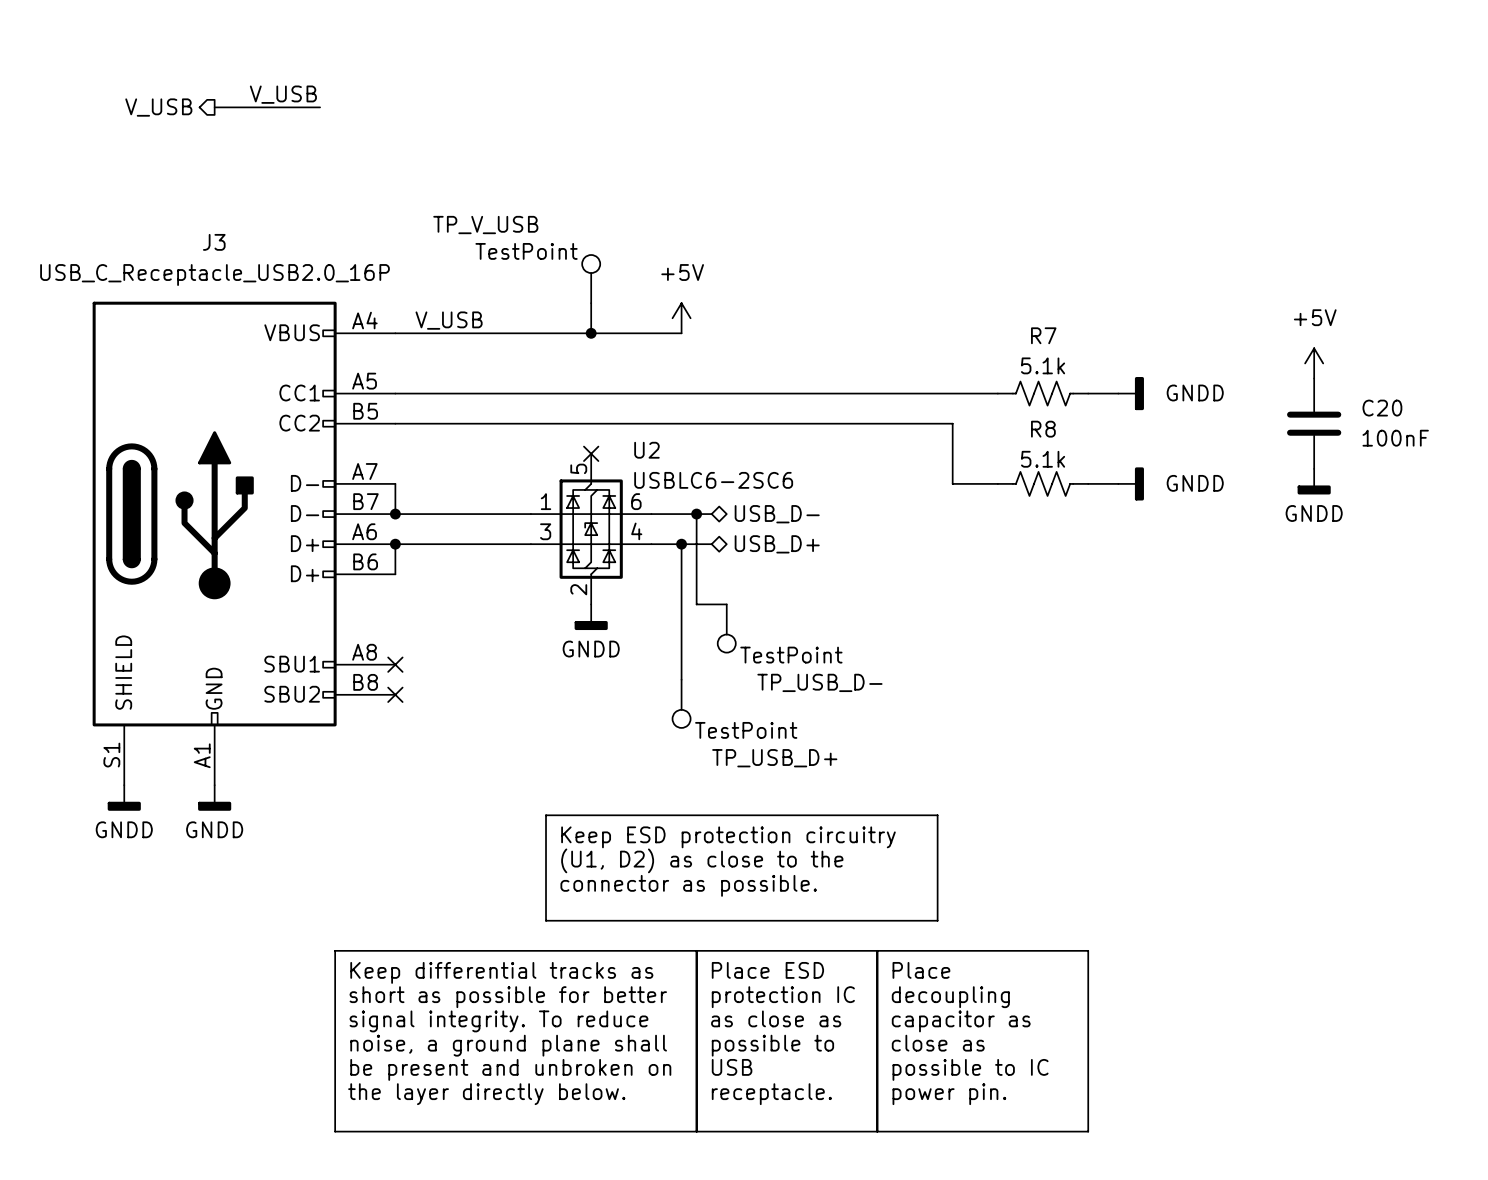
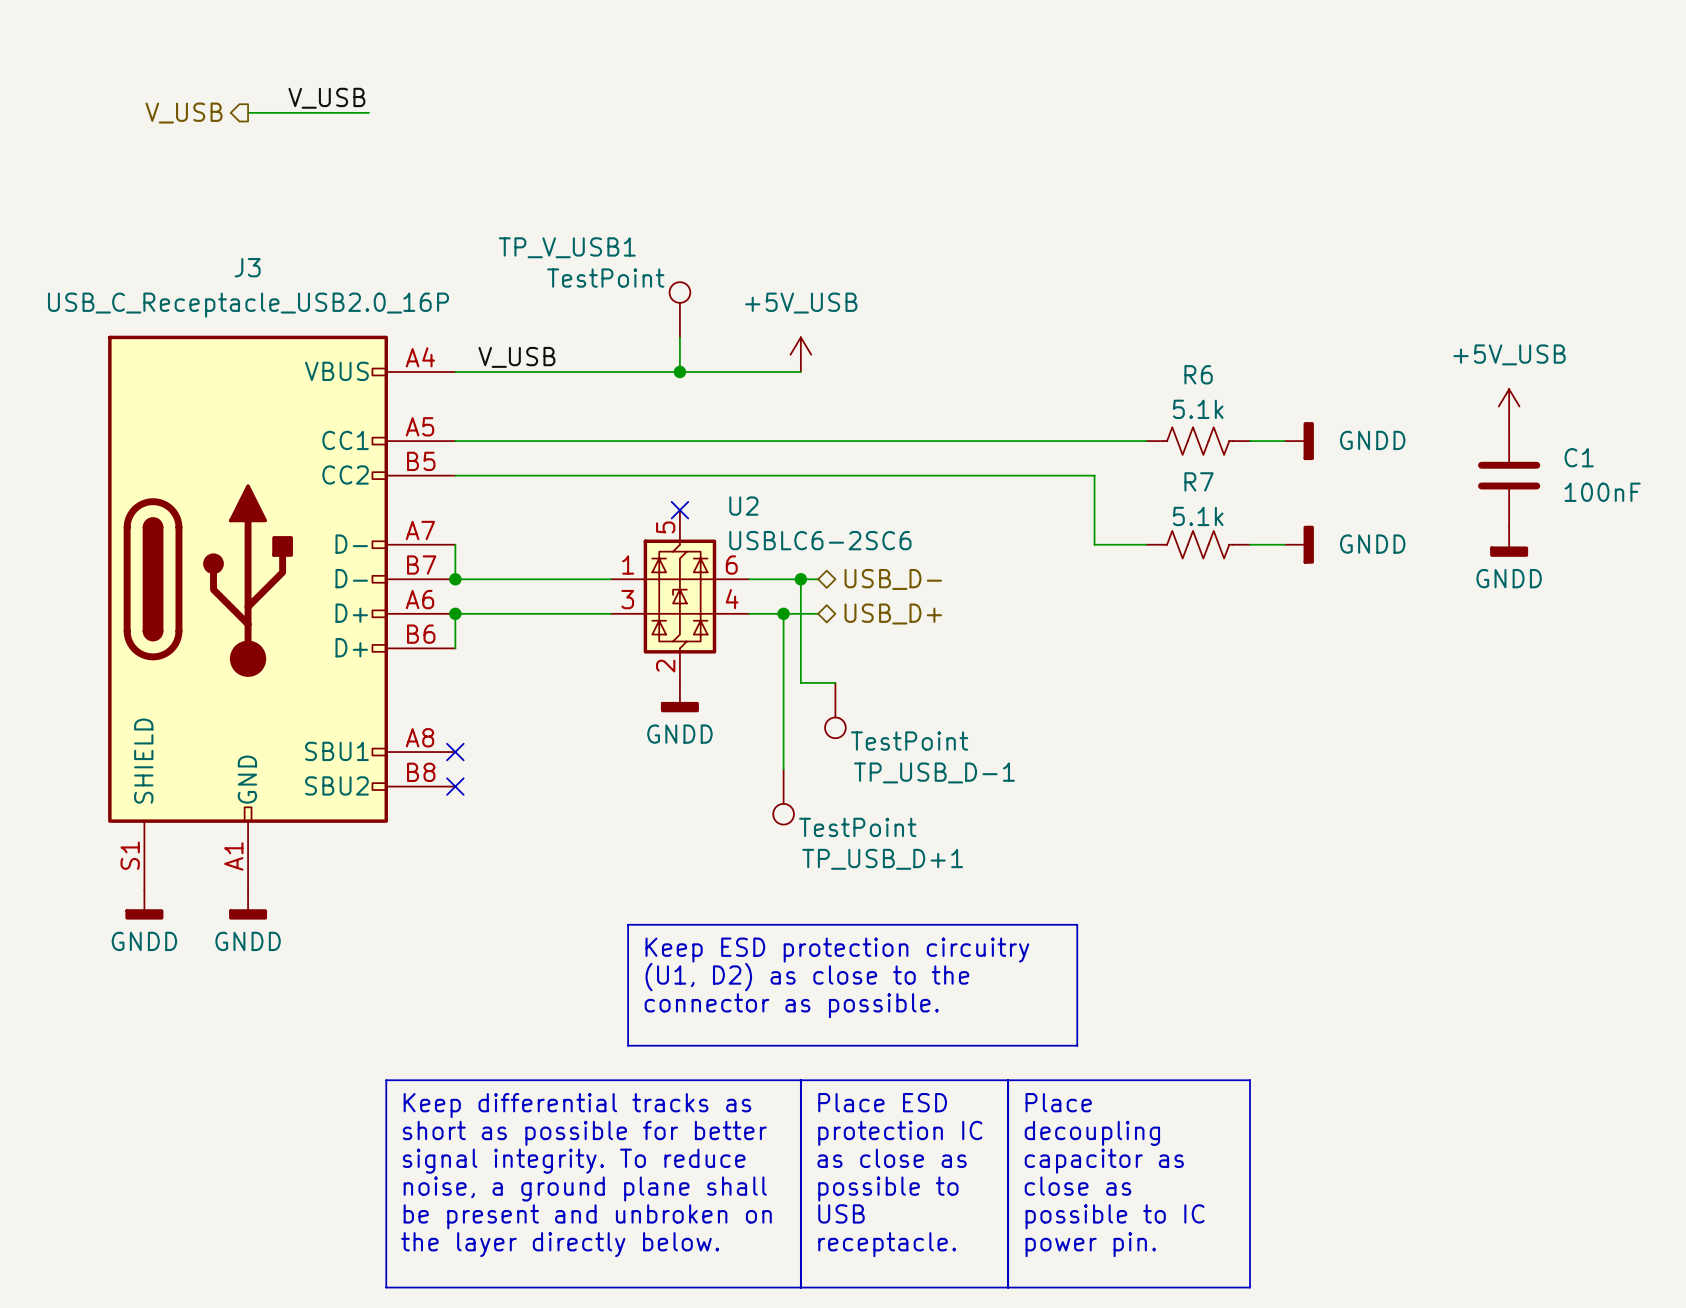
TP_V_USB name: TP_V_USB (485, 225) -> TP_V_USB1 (567, 247)
power symbol: +5V (681, 318) -> none
power symbol: none -> +5V_USB (800, 354)
wire: none -> (783, 371) (800, 371)
R7 name: R7 (1043, 335) -> R6 (1198, 374)
power symbol: +5V (1314, 363) -> +5V_USB (1509, 406)
C20 name: C20 (1382, 408) -> C1 (1579, 457)
R8 name: R8 (1043, 429) -> R7 (1199, 481)
TP_USB_D- name: TP_USB_D- (819, 682) -> TP_USB_D-1 (934, 772)
TP_USB_D+ name: TP_USB_D+ (774, 758) -> TP_USB_D+1 (882, 859)

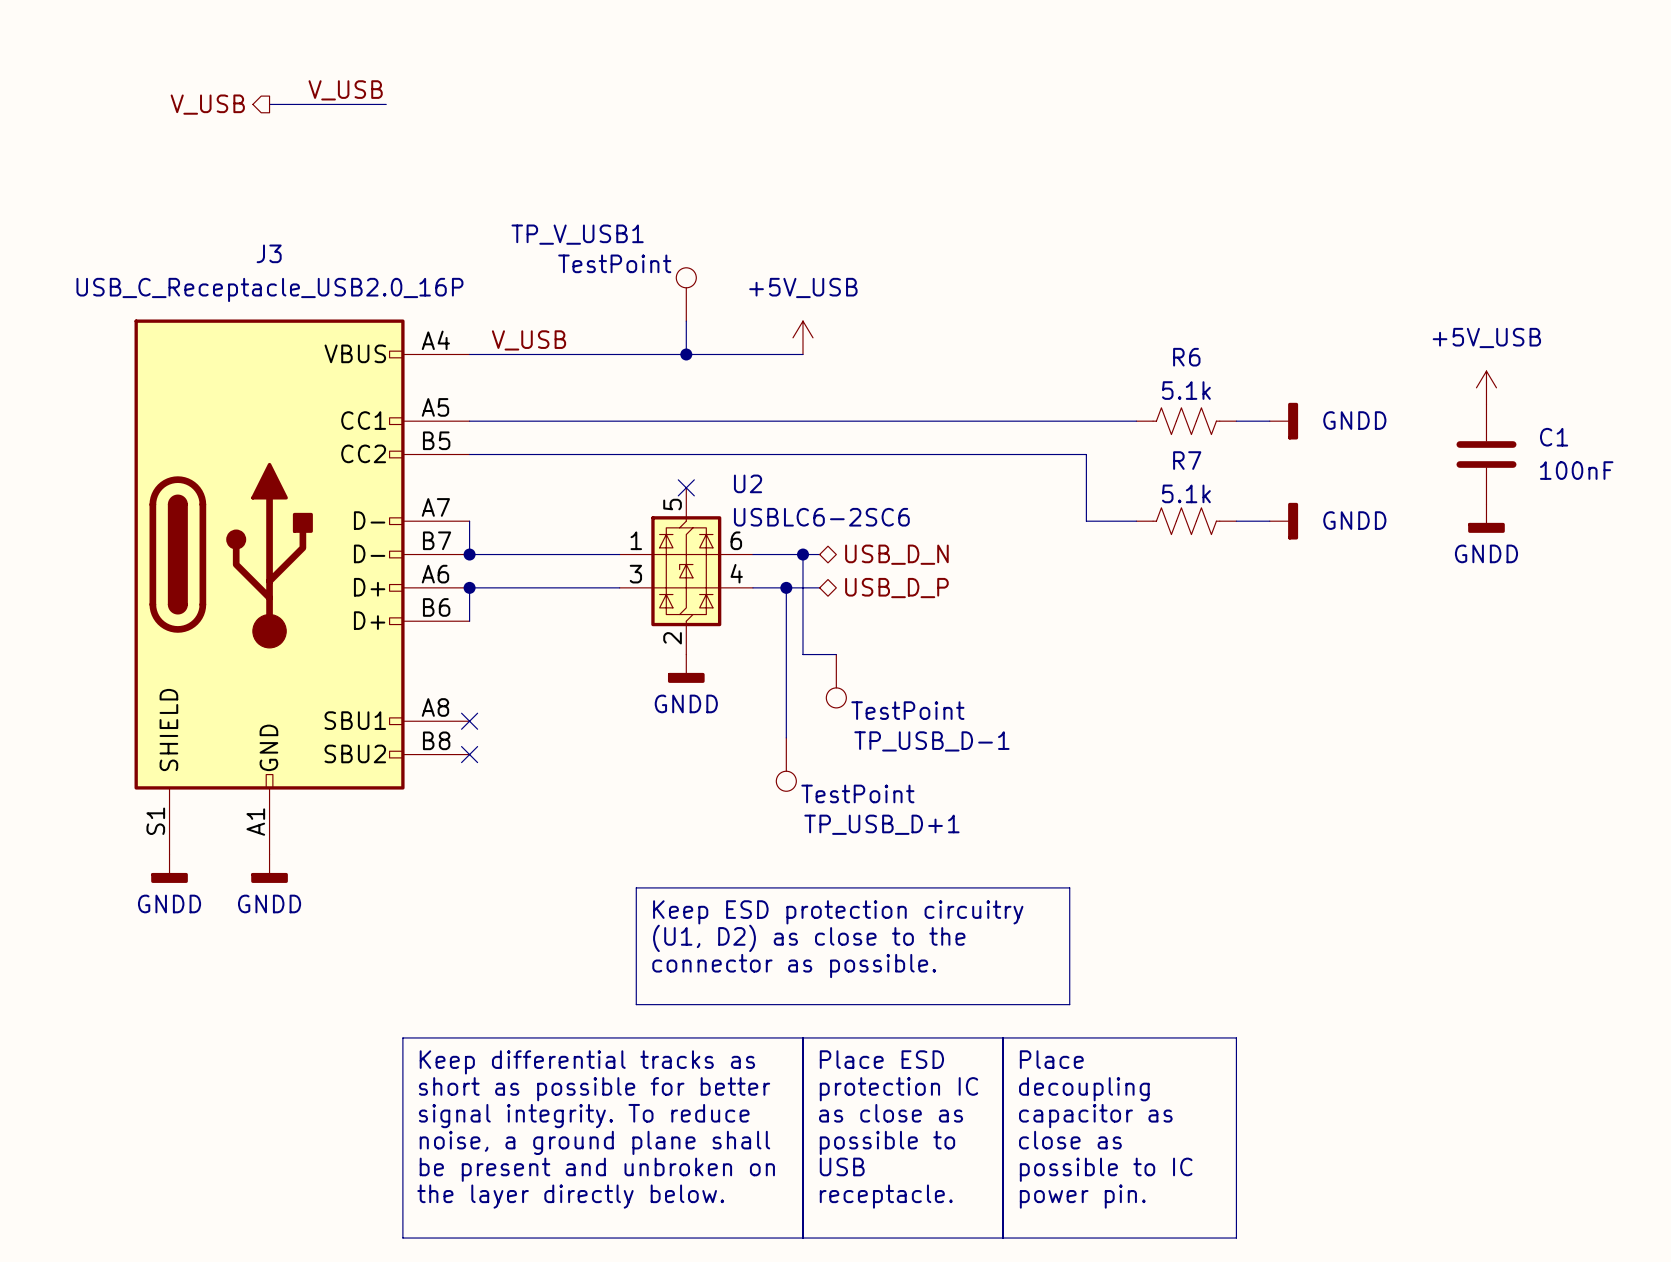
hierarchical label: USB_D- (893, 579) -> USB_D_N (896, 554)
hierarchical label: USB_D+ (893, 614) -> USB_D_P (896, 588)

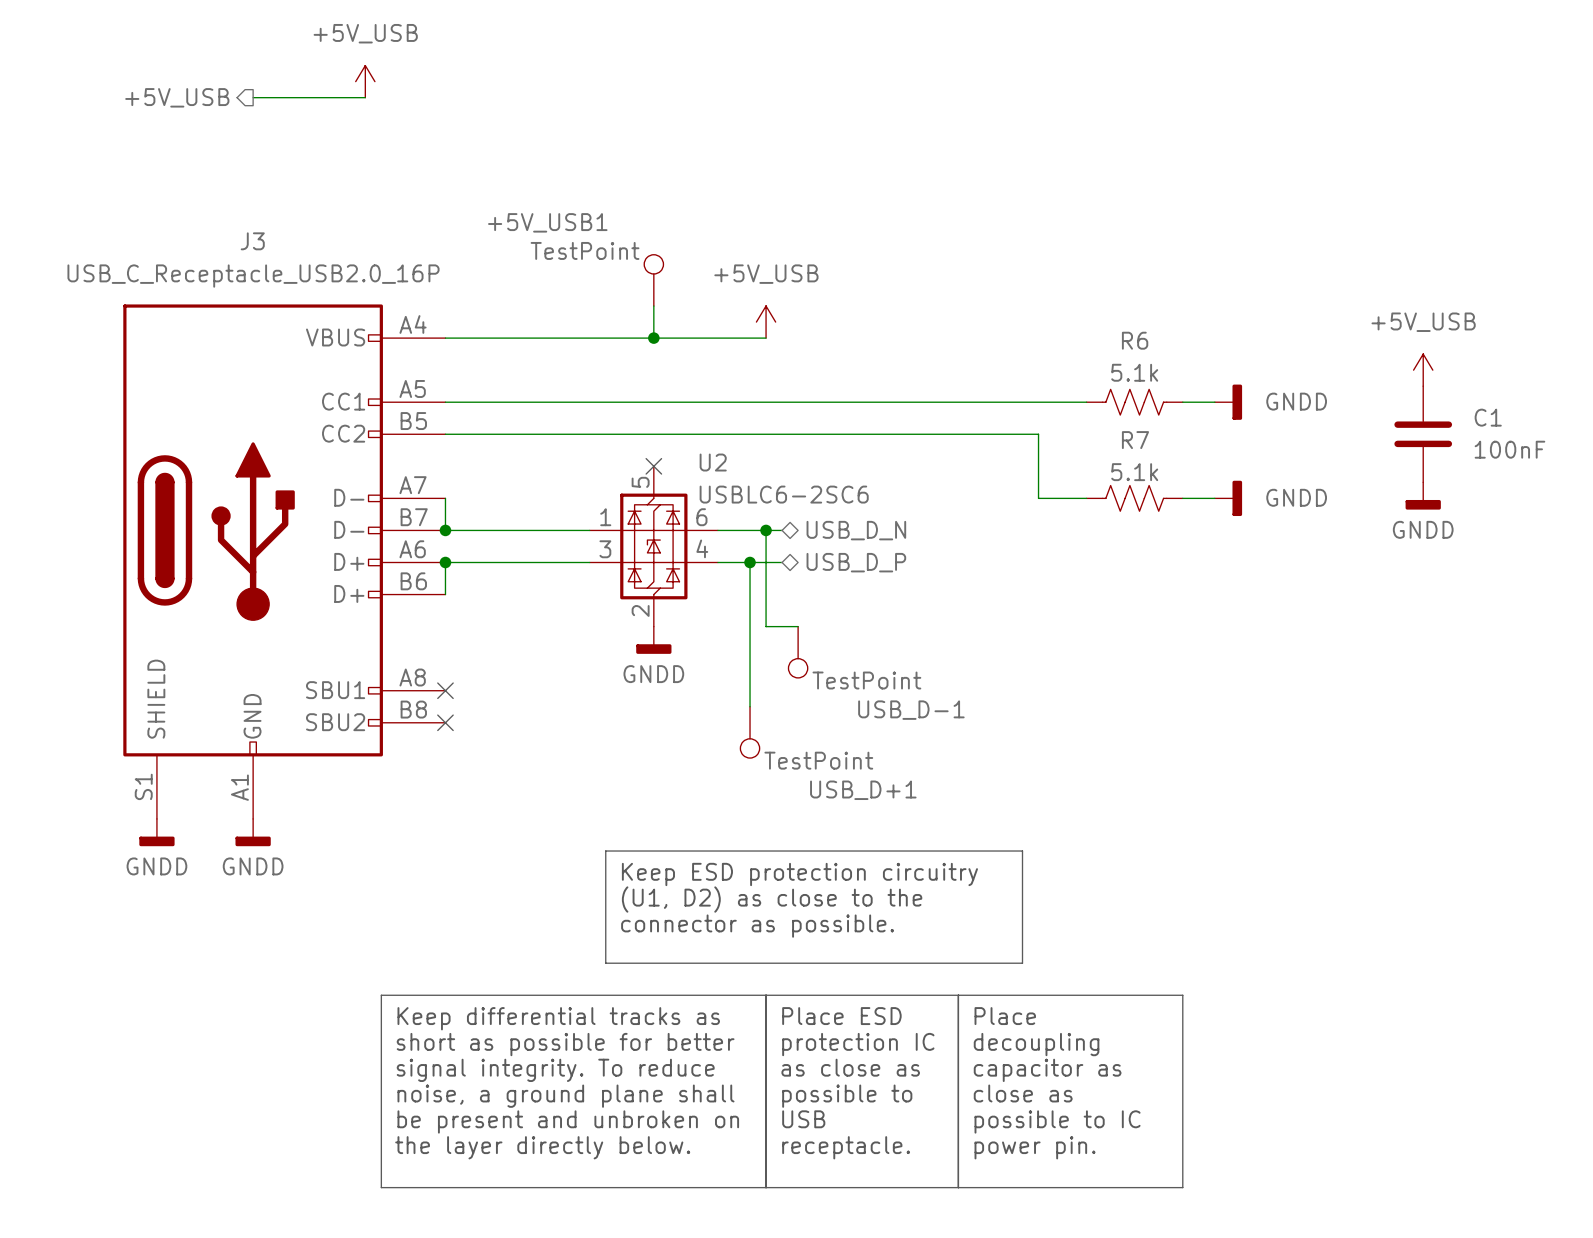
power symbol: none -> +5V_USB (365, 81)
label: V_USB (345, 90) -> none
hierarchical label: V_USB (207, 104) -> +5V_USB (177, 97)
TP_V_USB1 name: TP_V_USB1 (577, 234) -> +5V_USB1 (547, 222)
label: V_USB (529, 340) -> none
TP_USB_D-1 name: TP_USB_D-1 (931, 741) -> USB_D-1 (911, 710)
TP_USB_D+1 name: TP_USB_D+1 (881, 824) -> USB_D+1 (863, 790)

